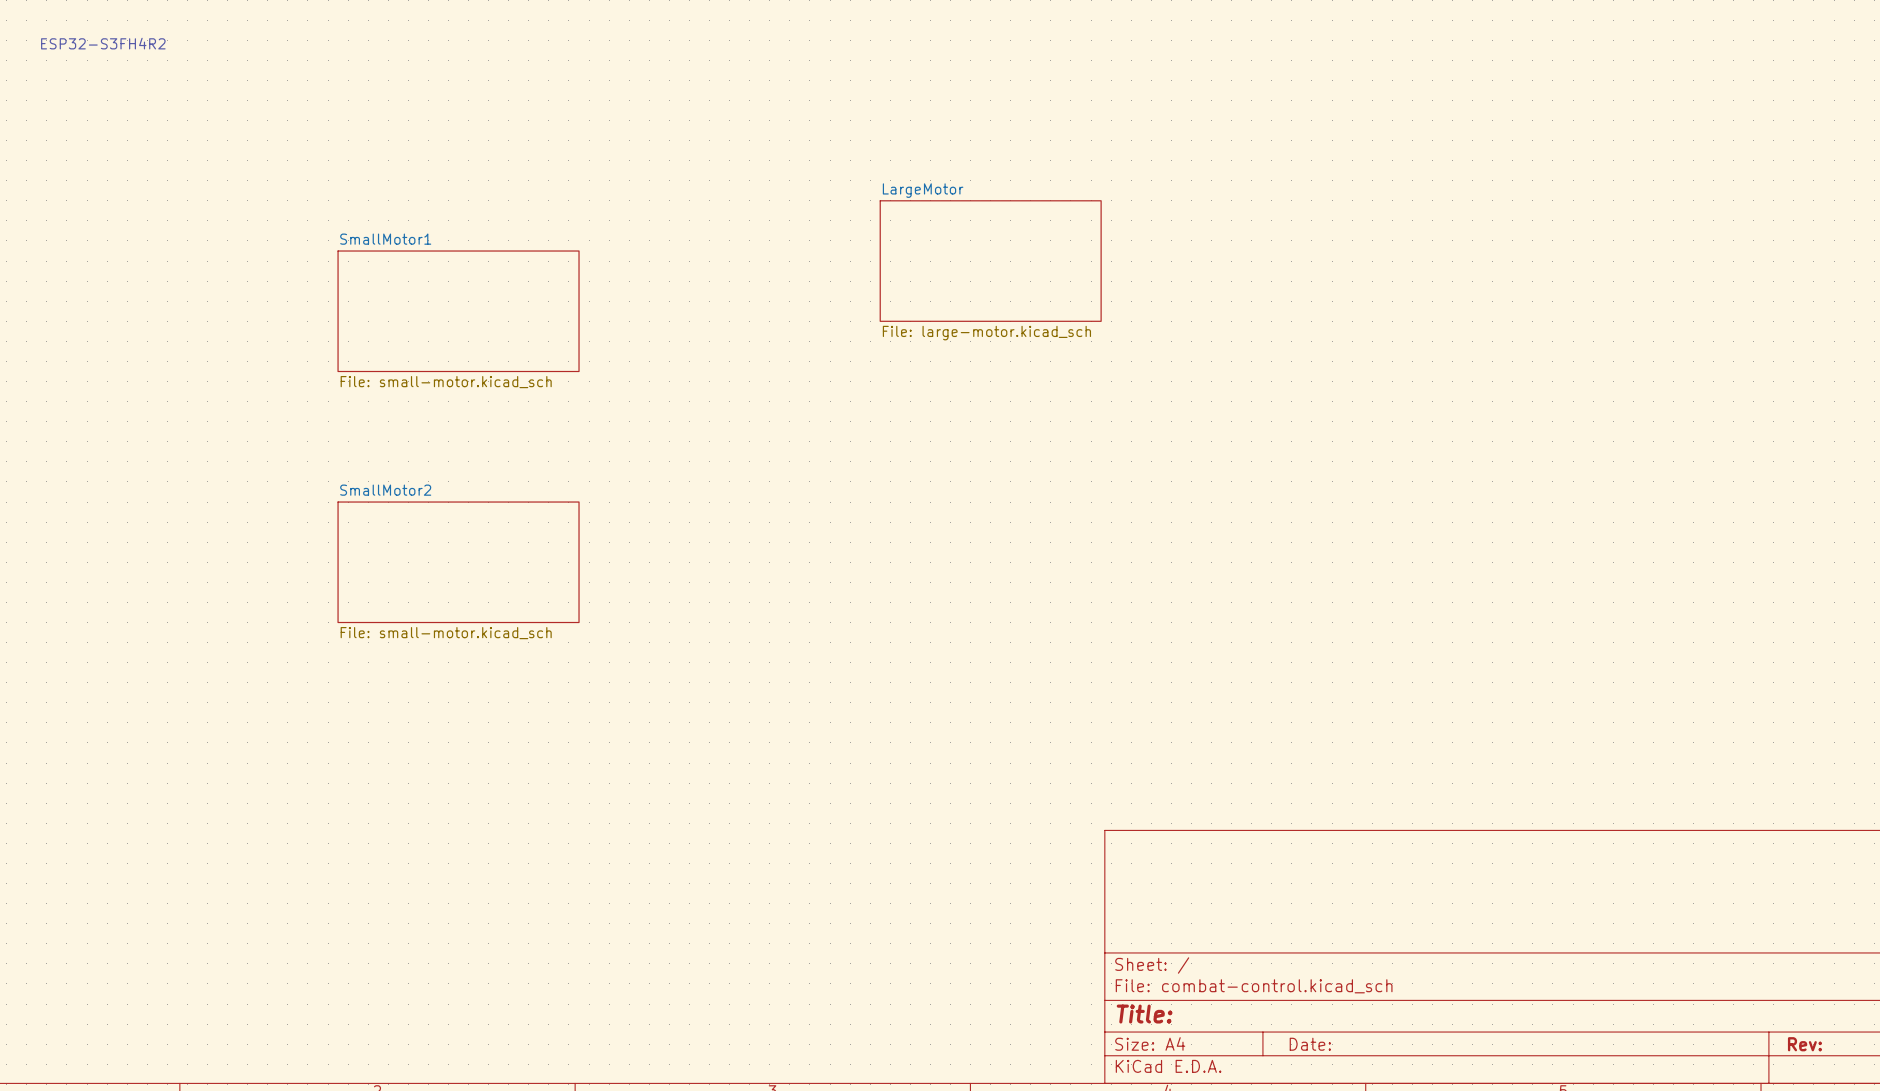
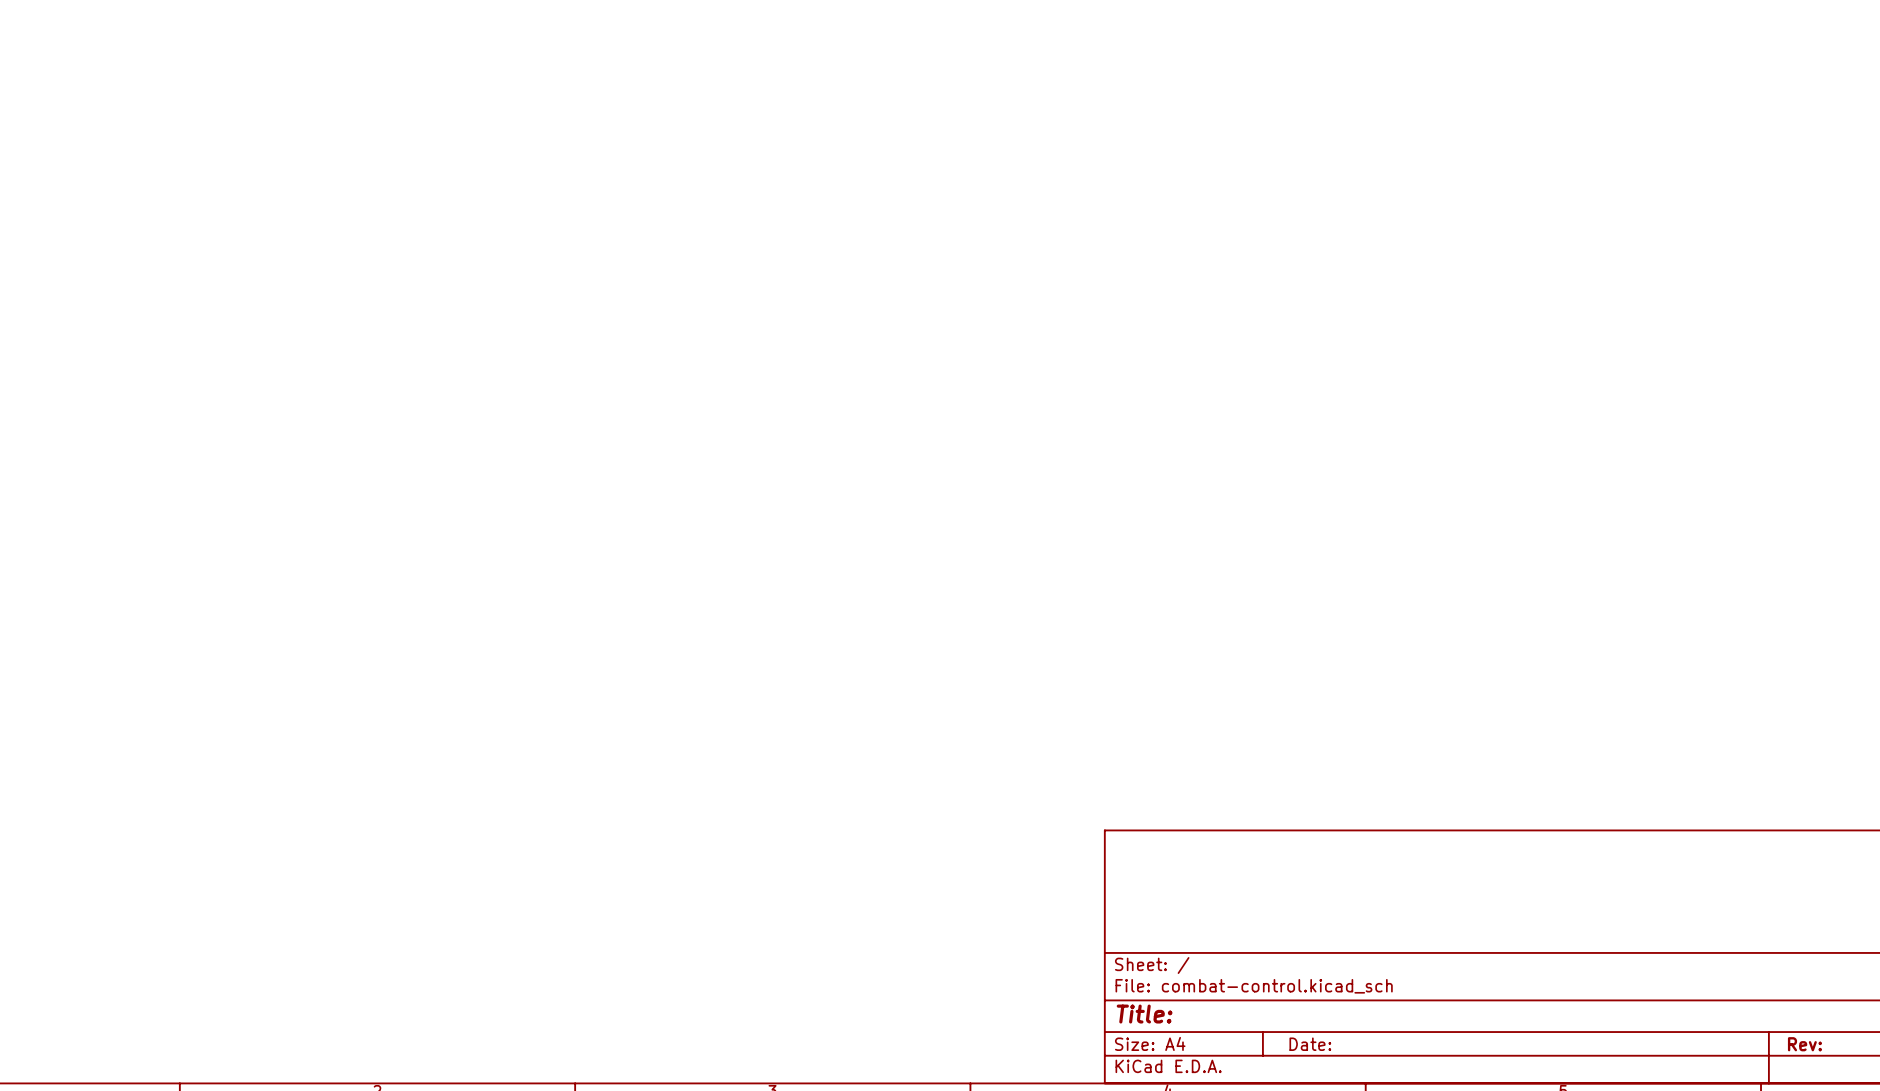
text: ESP32-S3FH4R2 (103, 43) -> none
sheet LargeMotor: File: large-motor.kicad_sch (990, 261) -> none
sheet SmallMotor1: File: small-motor.kicad_sch (458, 311) -> none
sheet SmallMotor2: File: small-motor.kicad_sch (458, 562) -> none

